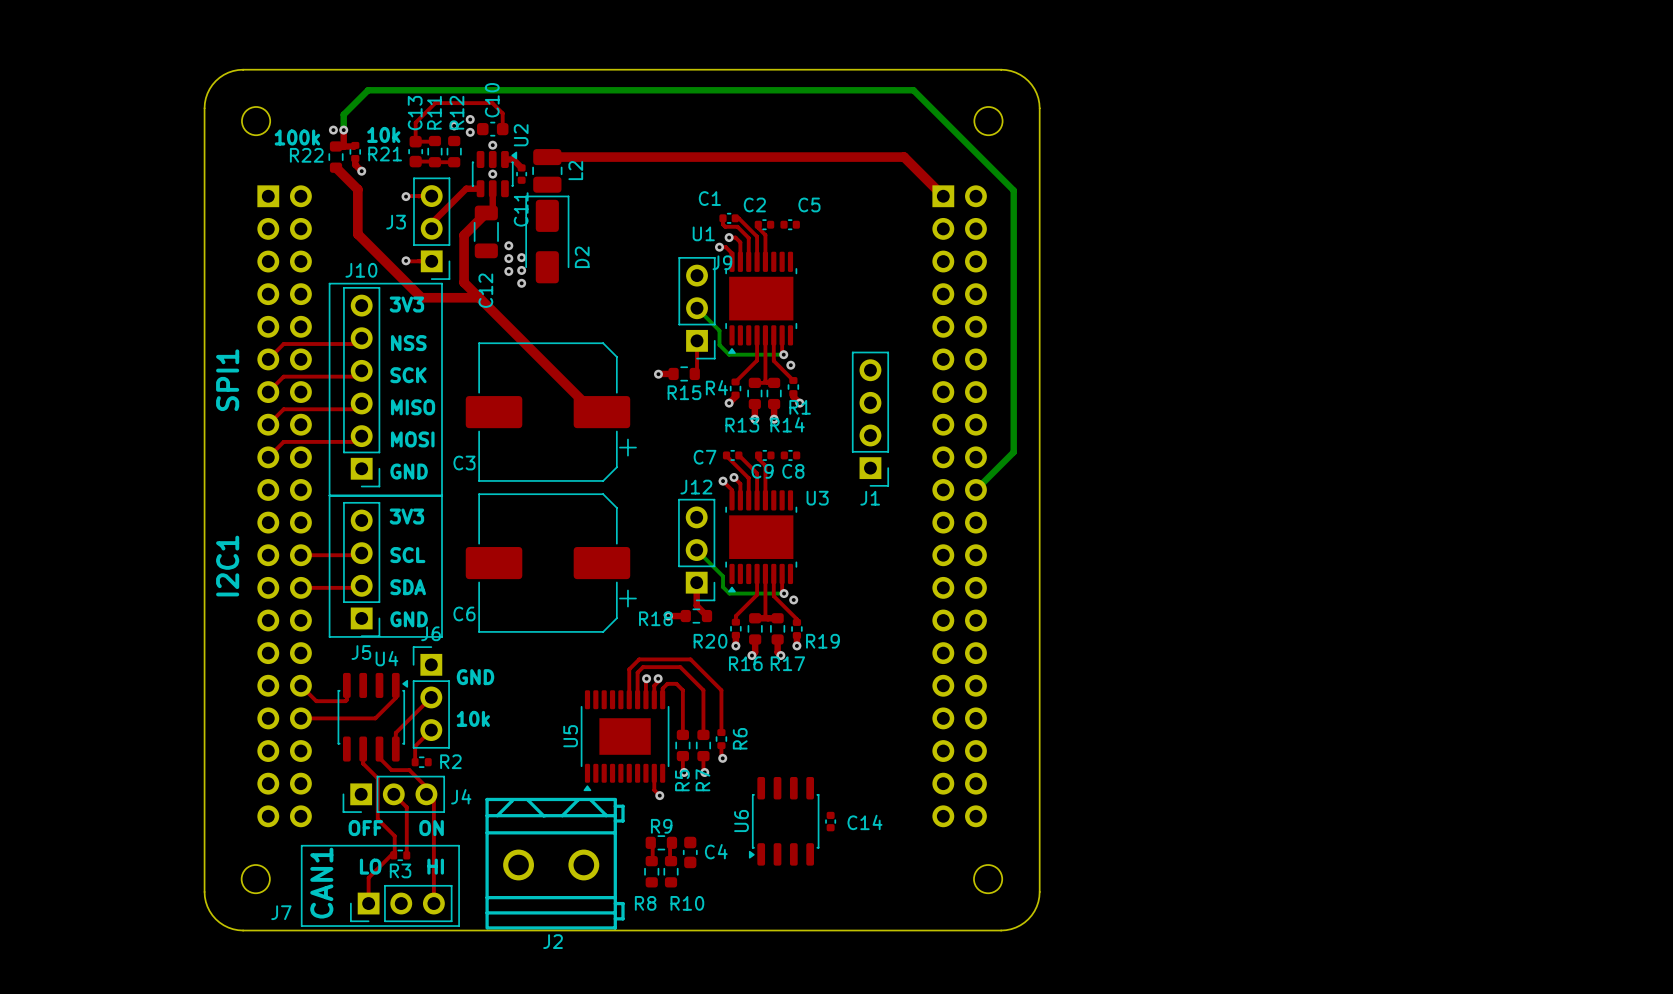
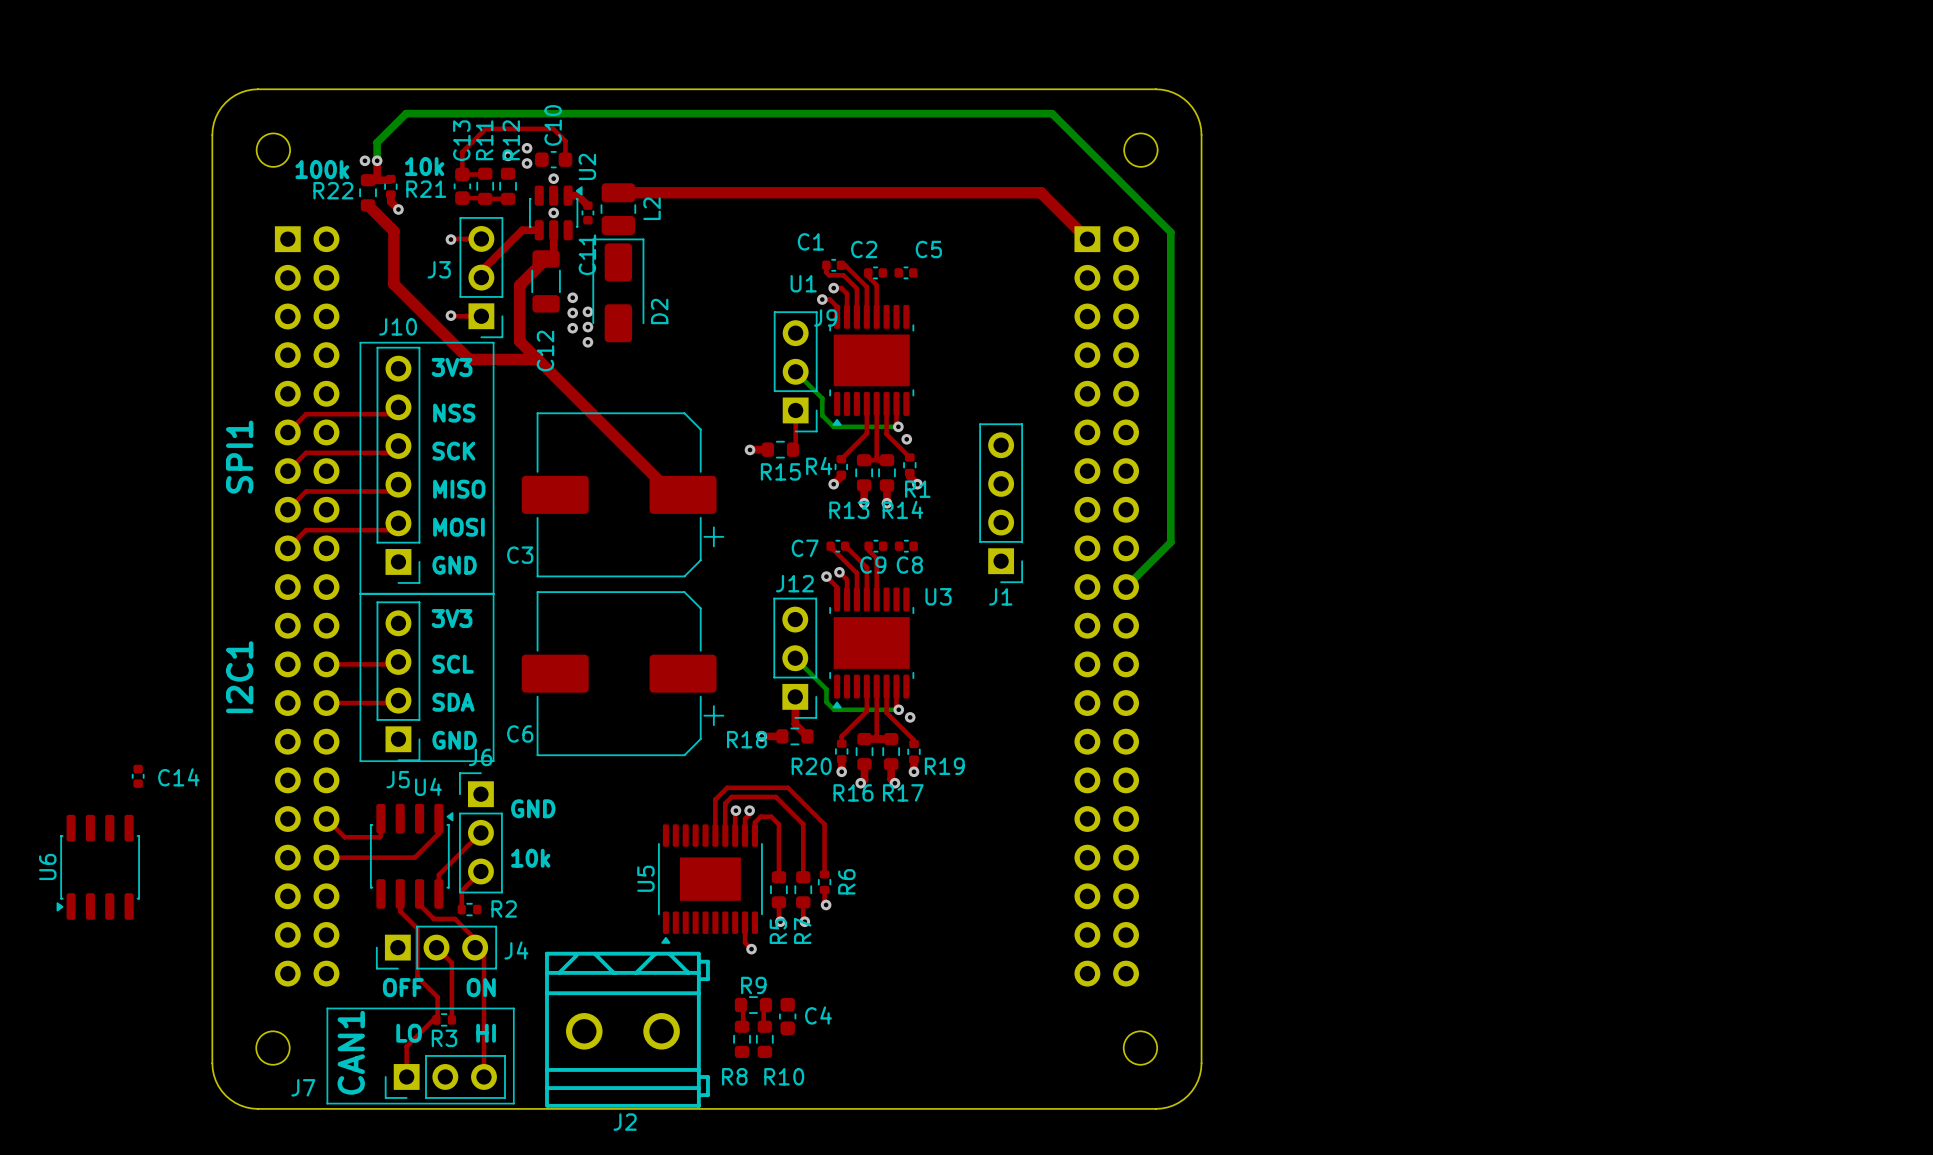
U6 position: (784, 821) -> (98, 867)
C14 position: (830, 821) -> (138, 776)

